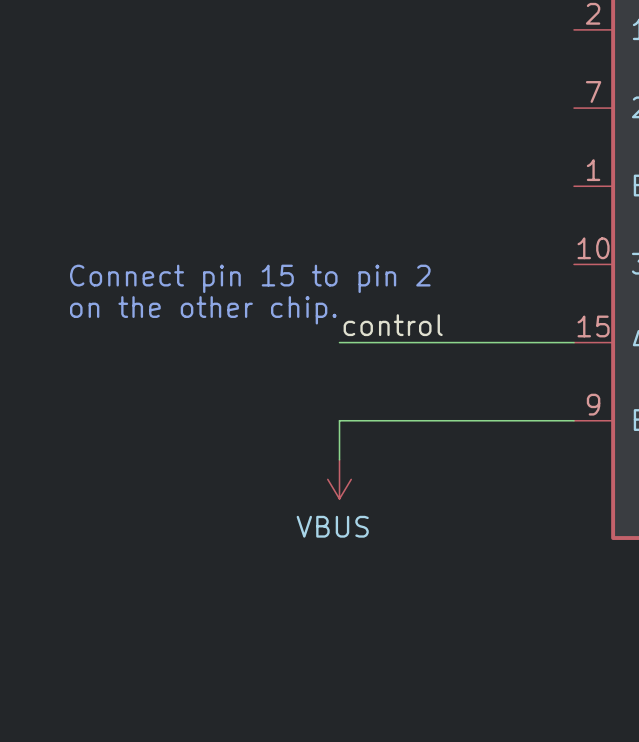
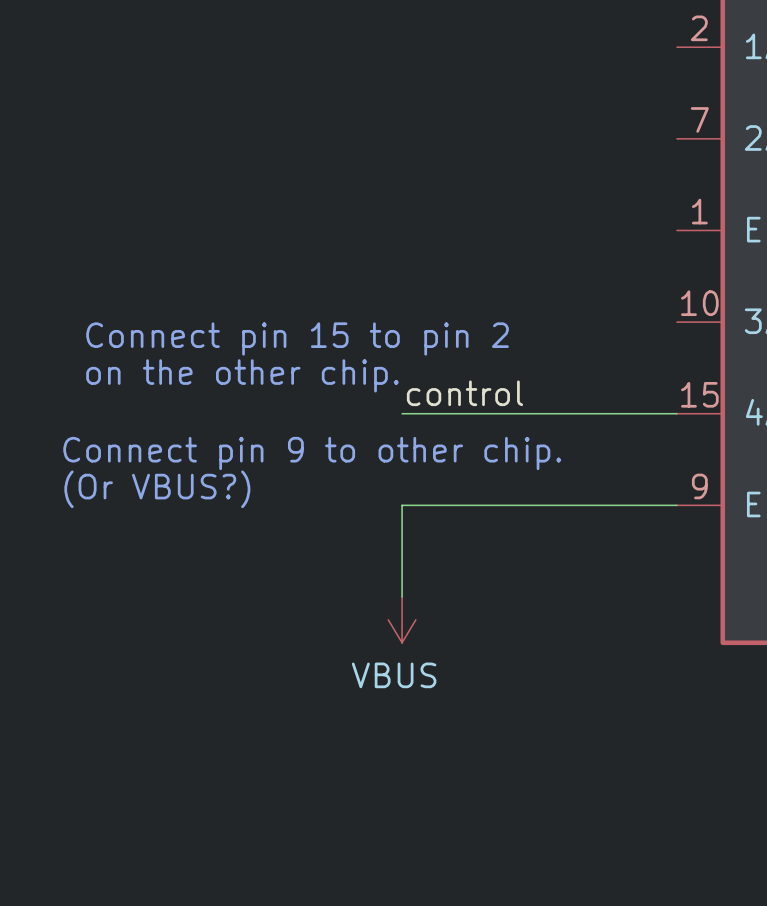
text: none -> Connect pin 9 to other chip. (312, 453)
text: none -> (Or VBUS?) (157, 489)
power symbol position: VBUS (339, 479) -> VBUS (402, 619)

